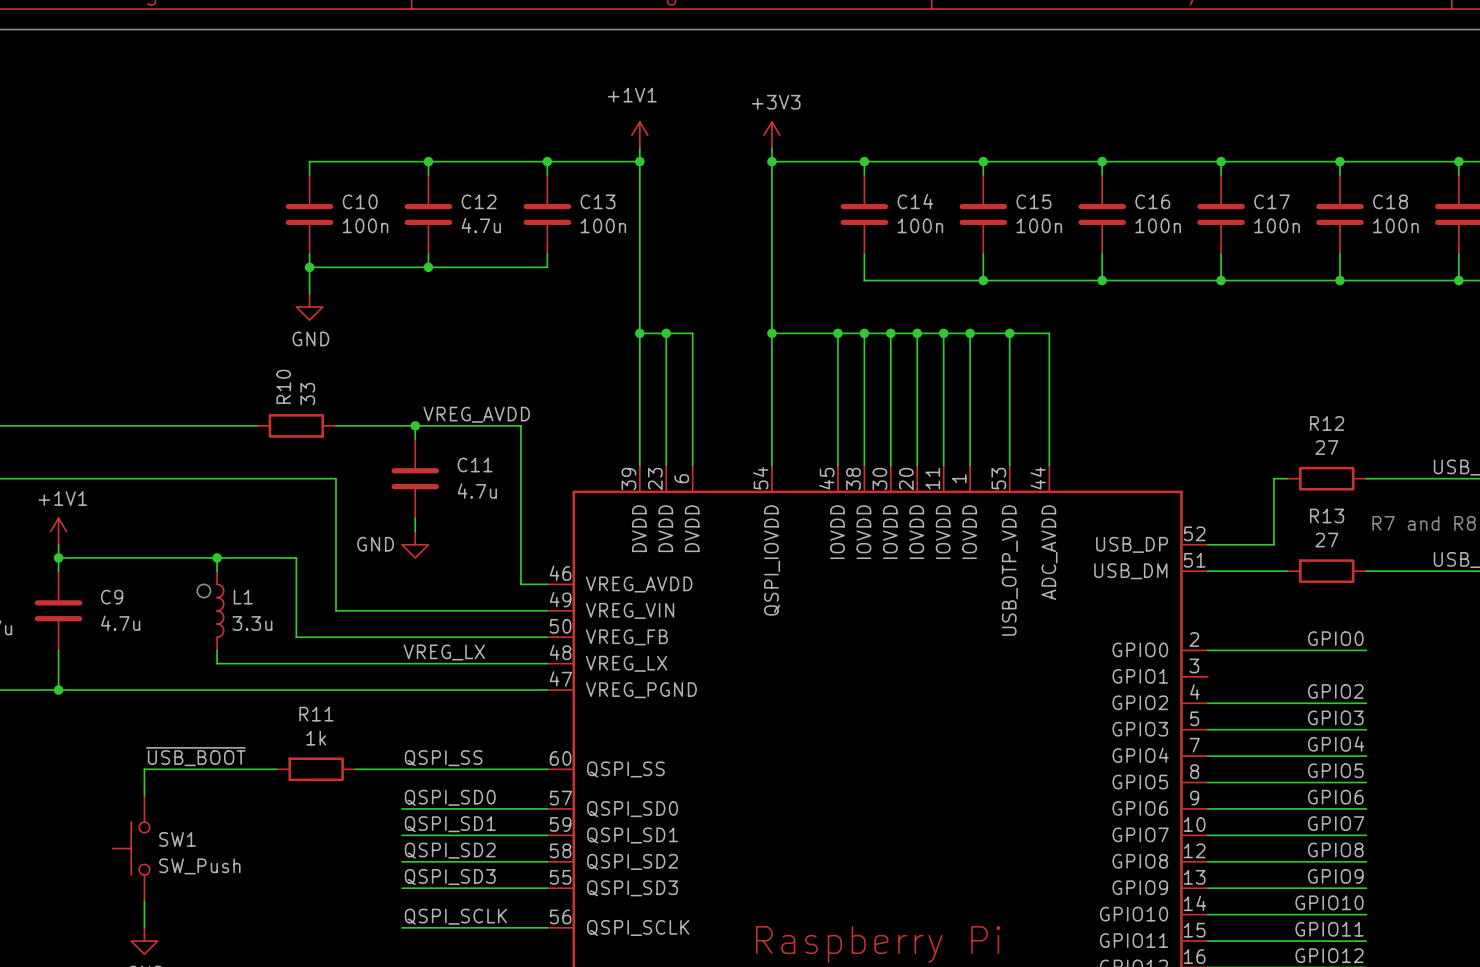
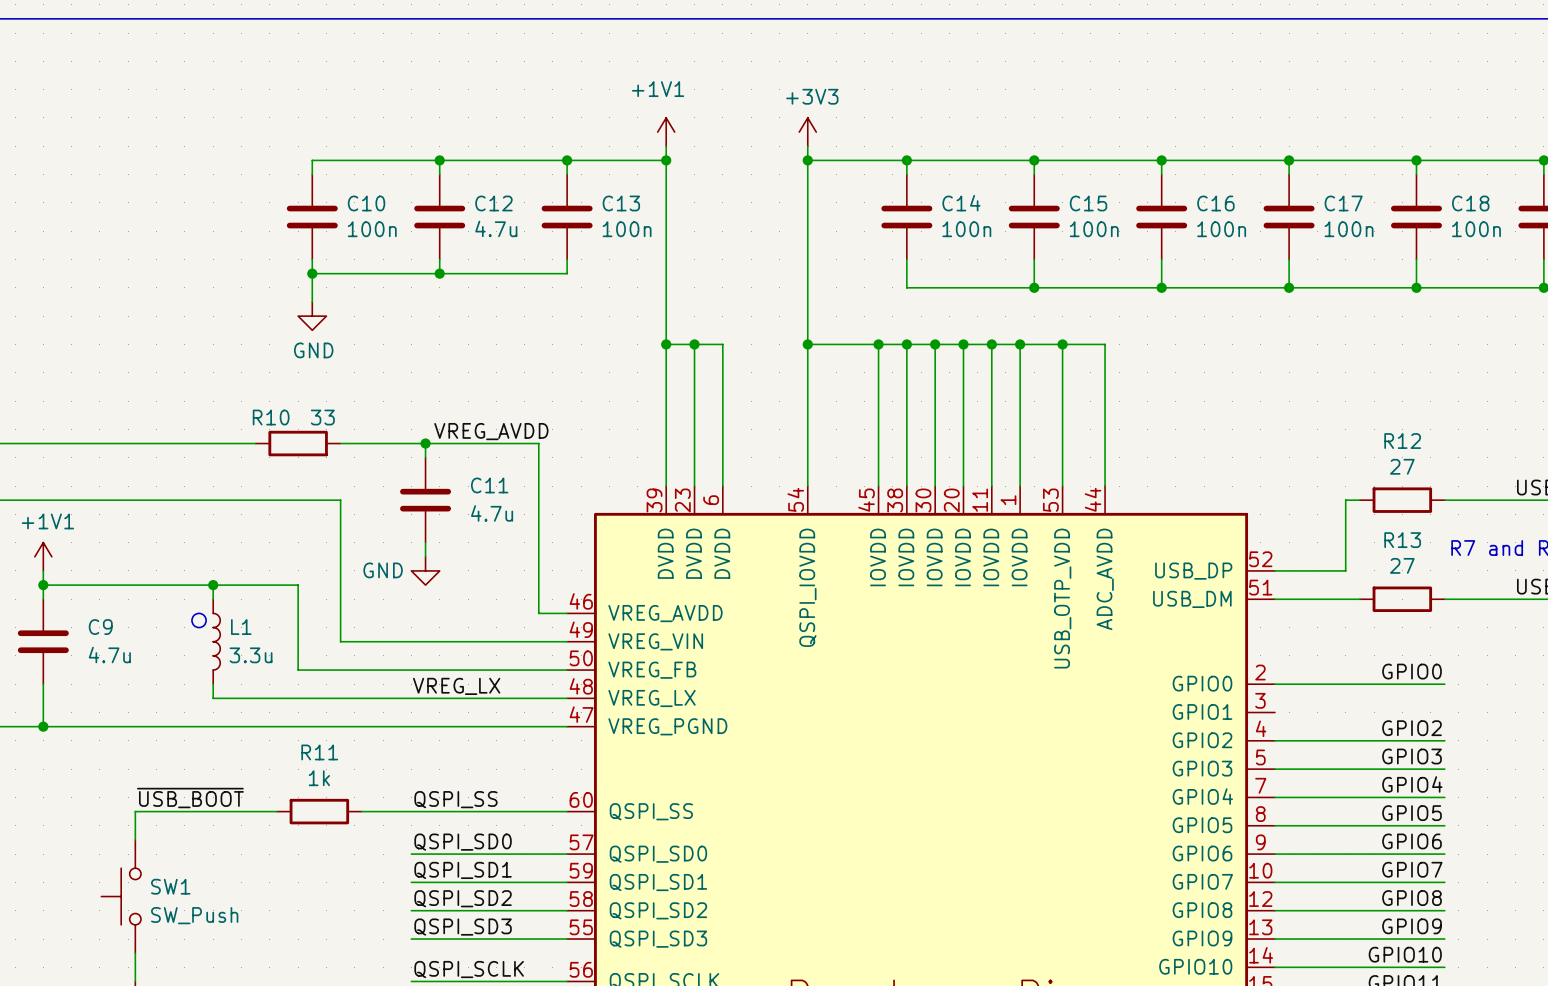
R10 name rotation: 0° (283, 386) -> 90° clockwise (271, 417)
R10 value rotation: 0° (307, 394) -> 90° clockwise (322, 417)

